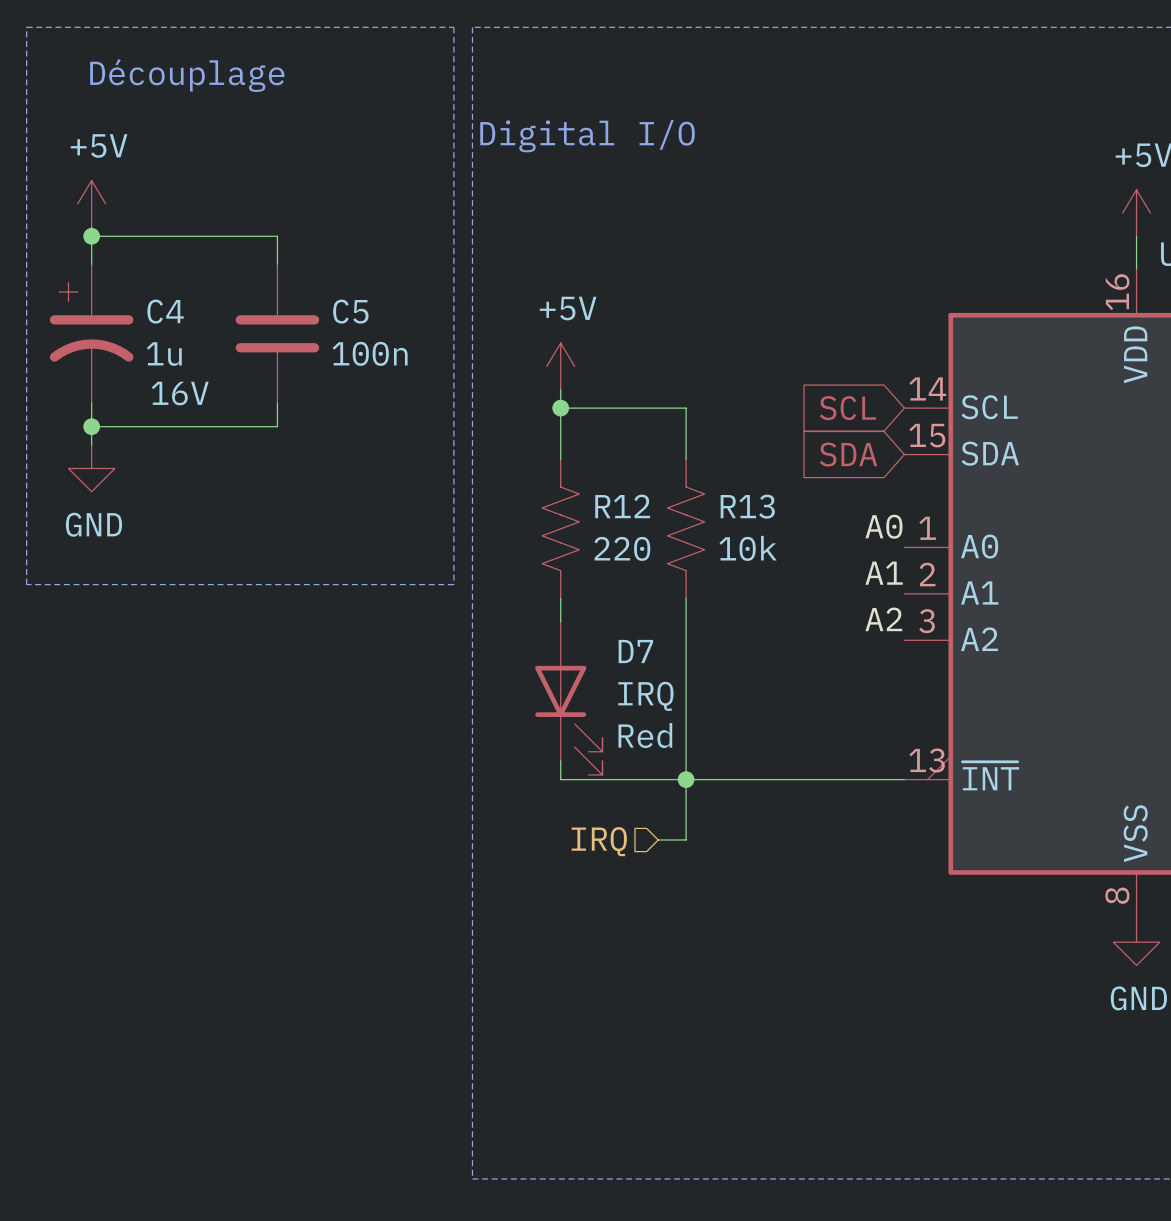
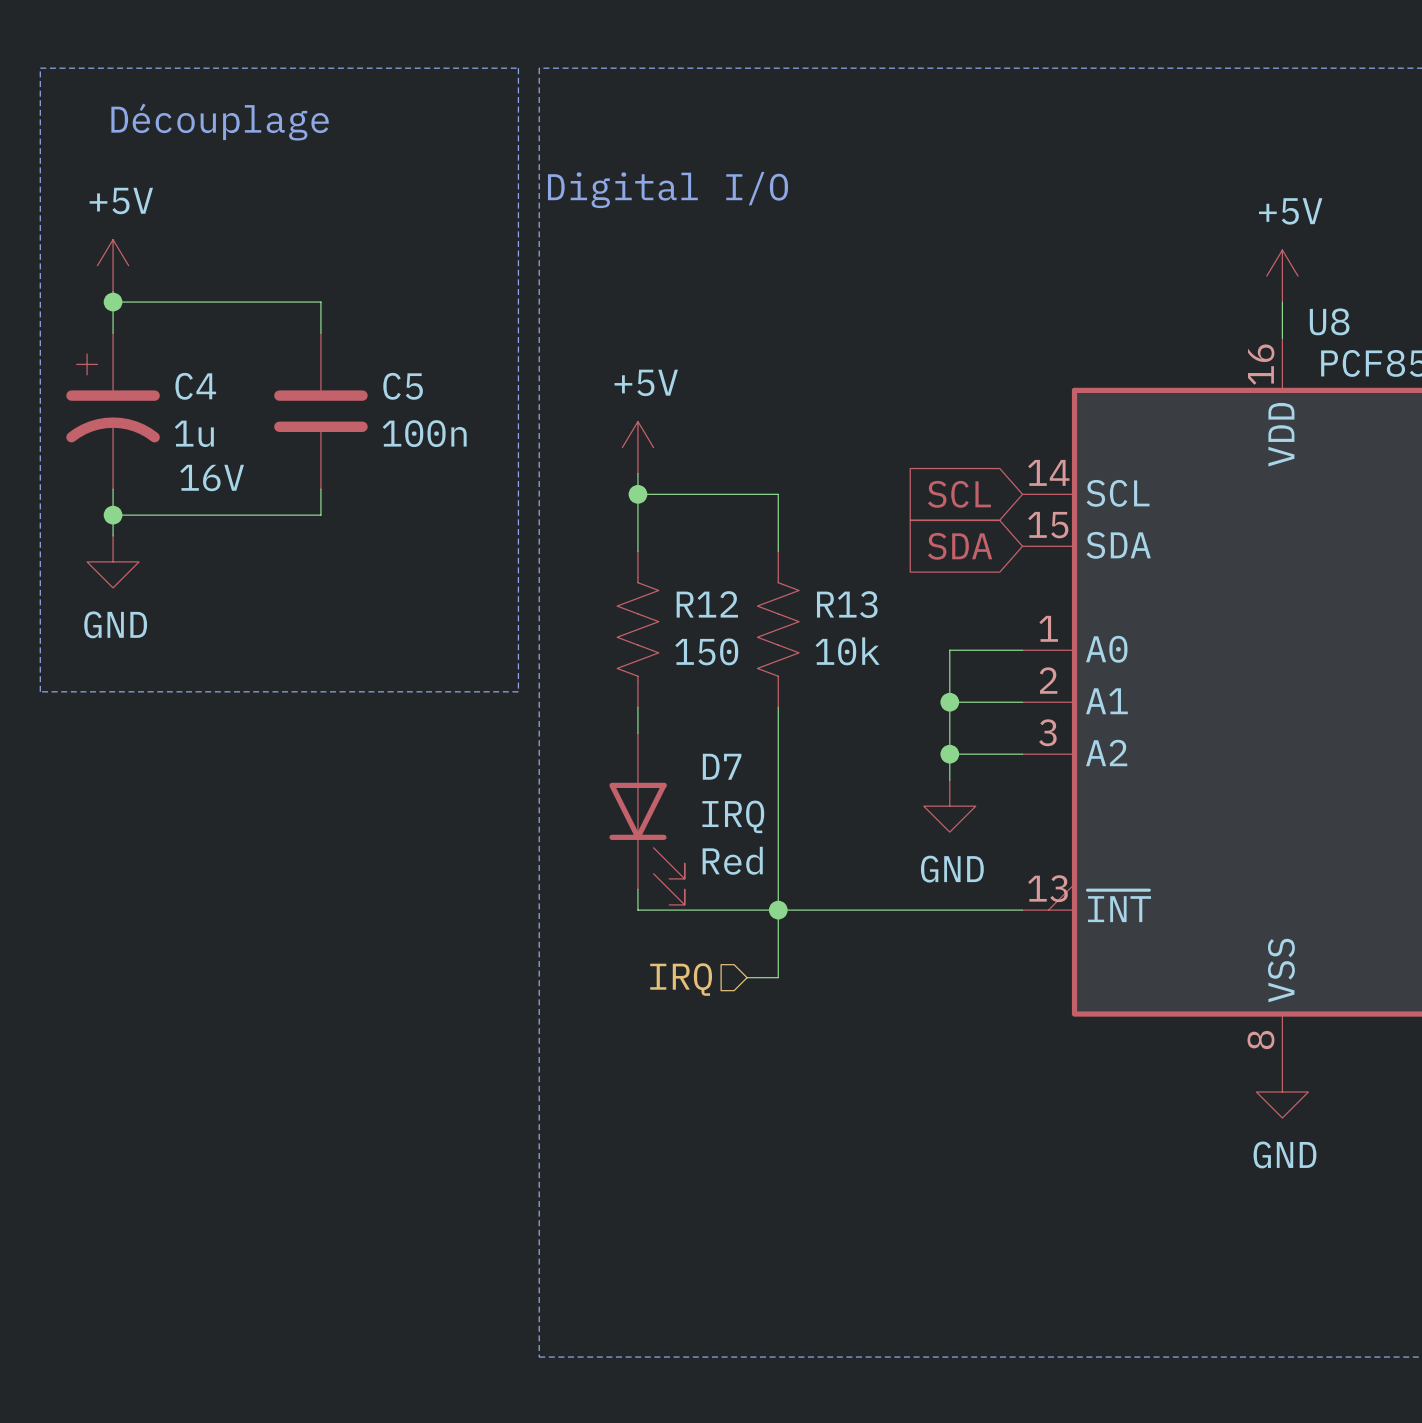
label: A0 (883, 526) -> none
wire: none -> (1022, 650) (949, 650) (949, 780)
R12 value: 220 (622, 548) -> 150 (706, 651)
label: A1 (884, 573) -> none
wire: none -> (949, 702) (1022, 702)
junction: none -> (949, 702)
label: A2 (883, 619) -> none
wire: none -> (949, 754) (1022, 754)
junction: none -> (949, 754)
power symbol: none -> GND (949, 806)

